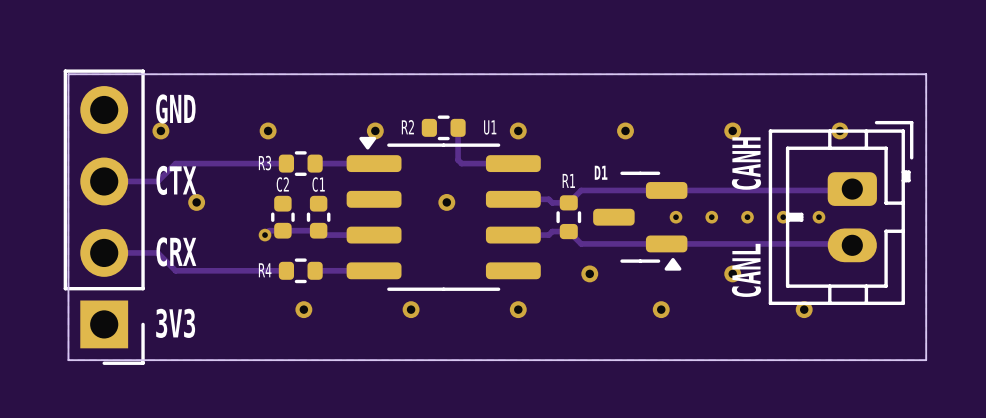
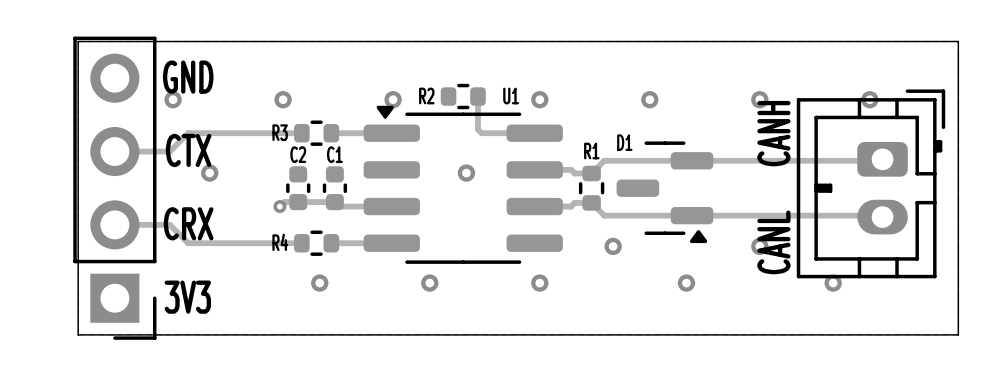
via: (676, 217) -> none
via: (711, 217) -> none
via: (747, 217) -> none
via: (783, 217) -> none
via: (818, 217) -> none

